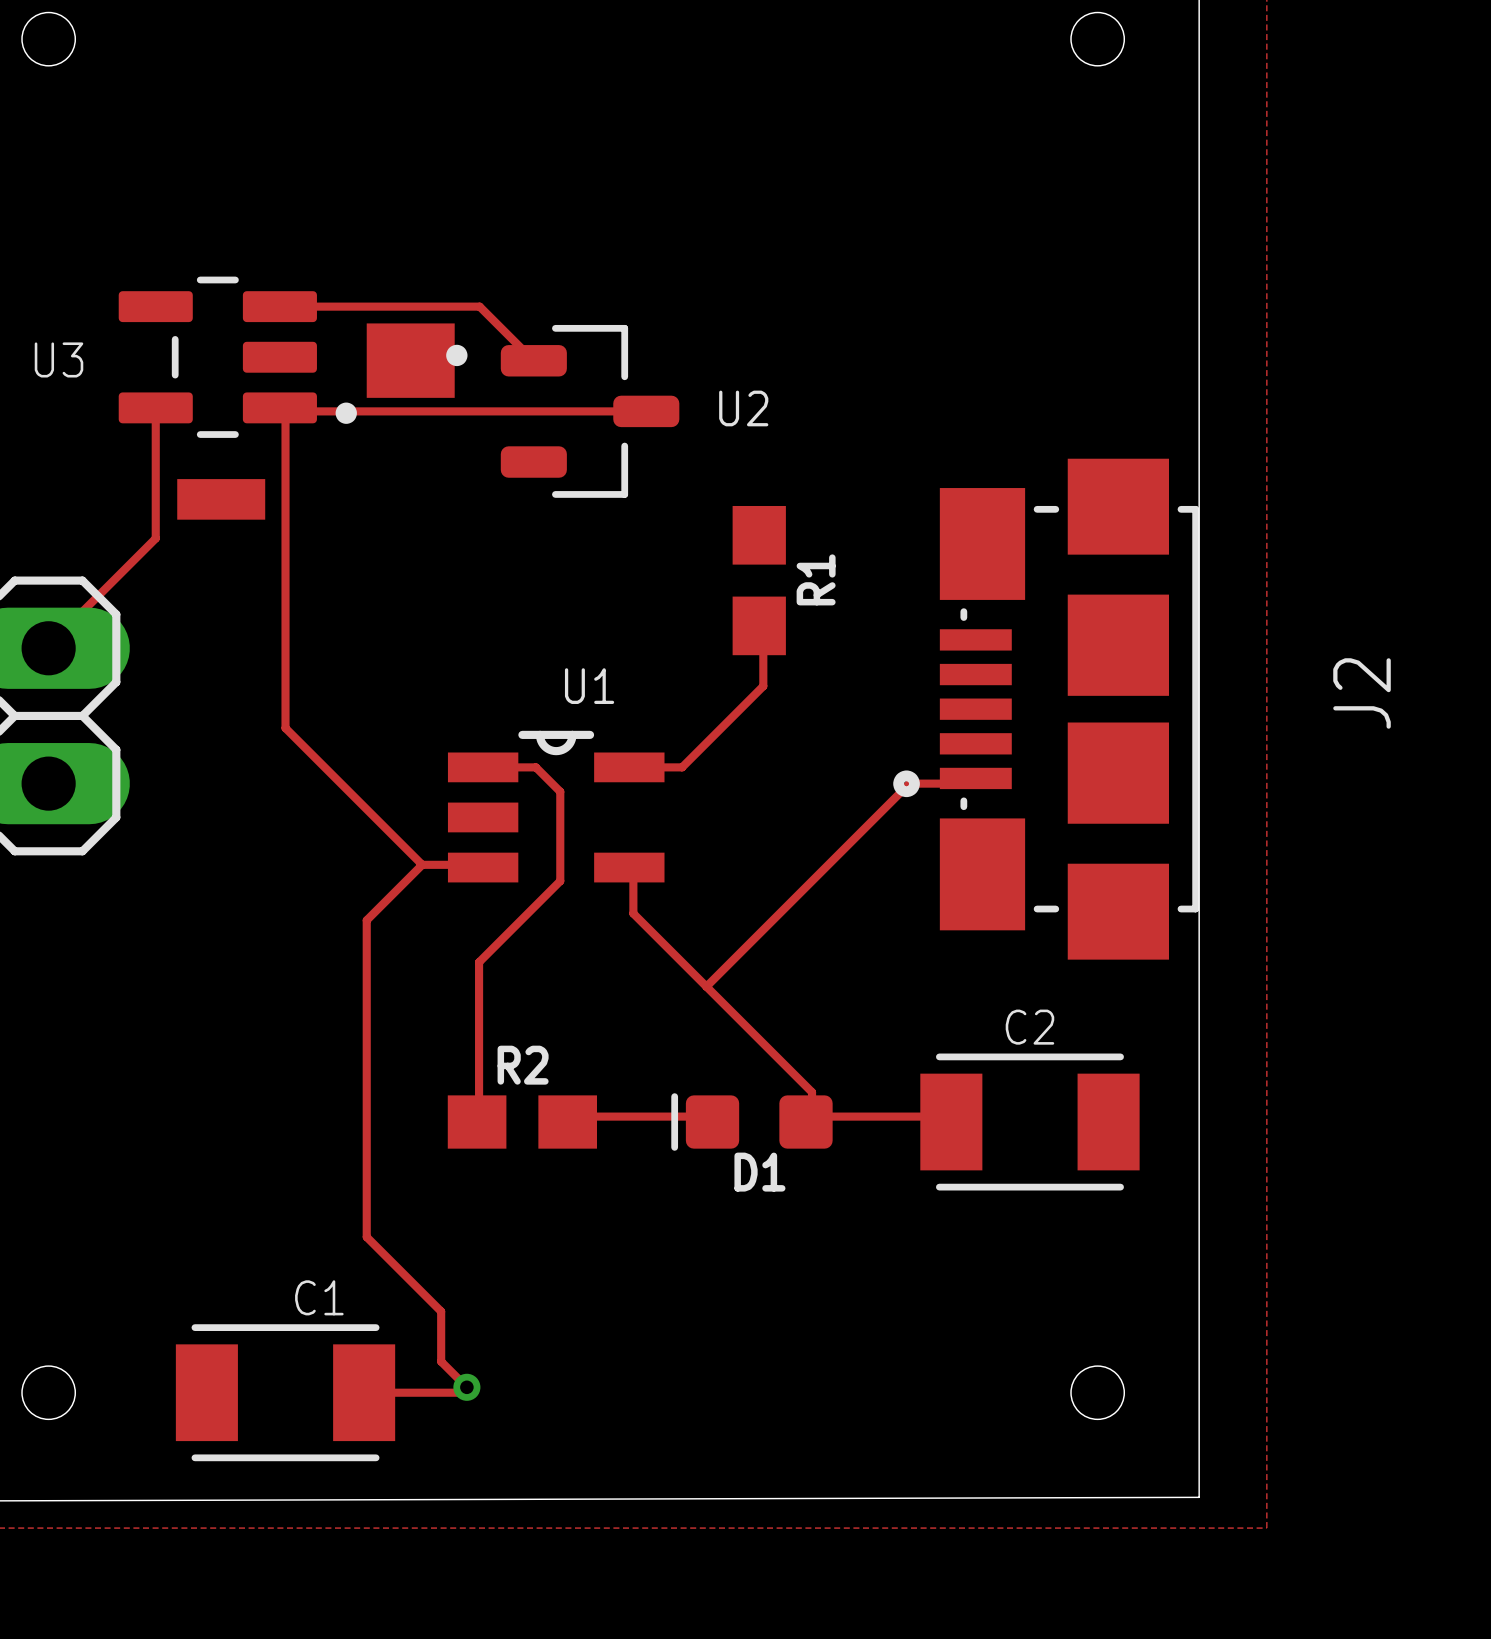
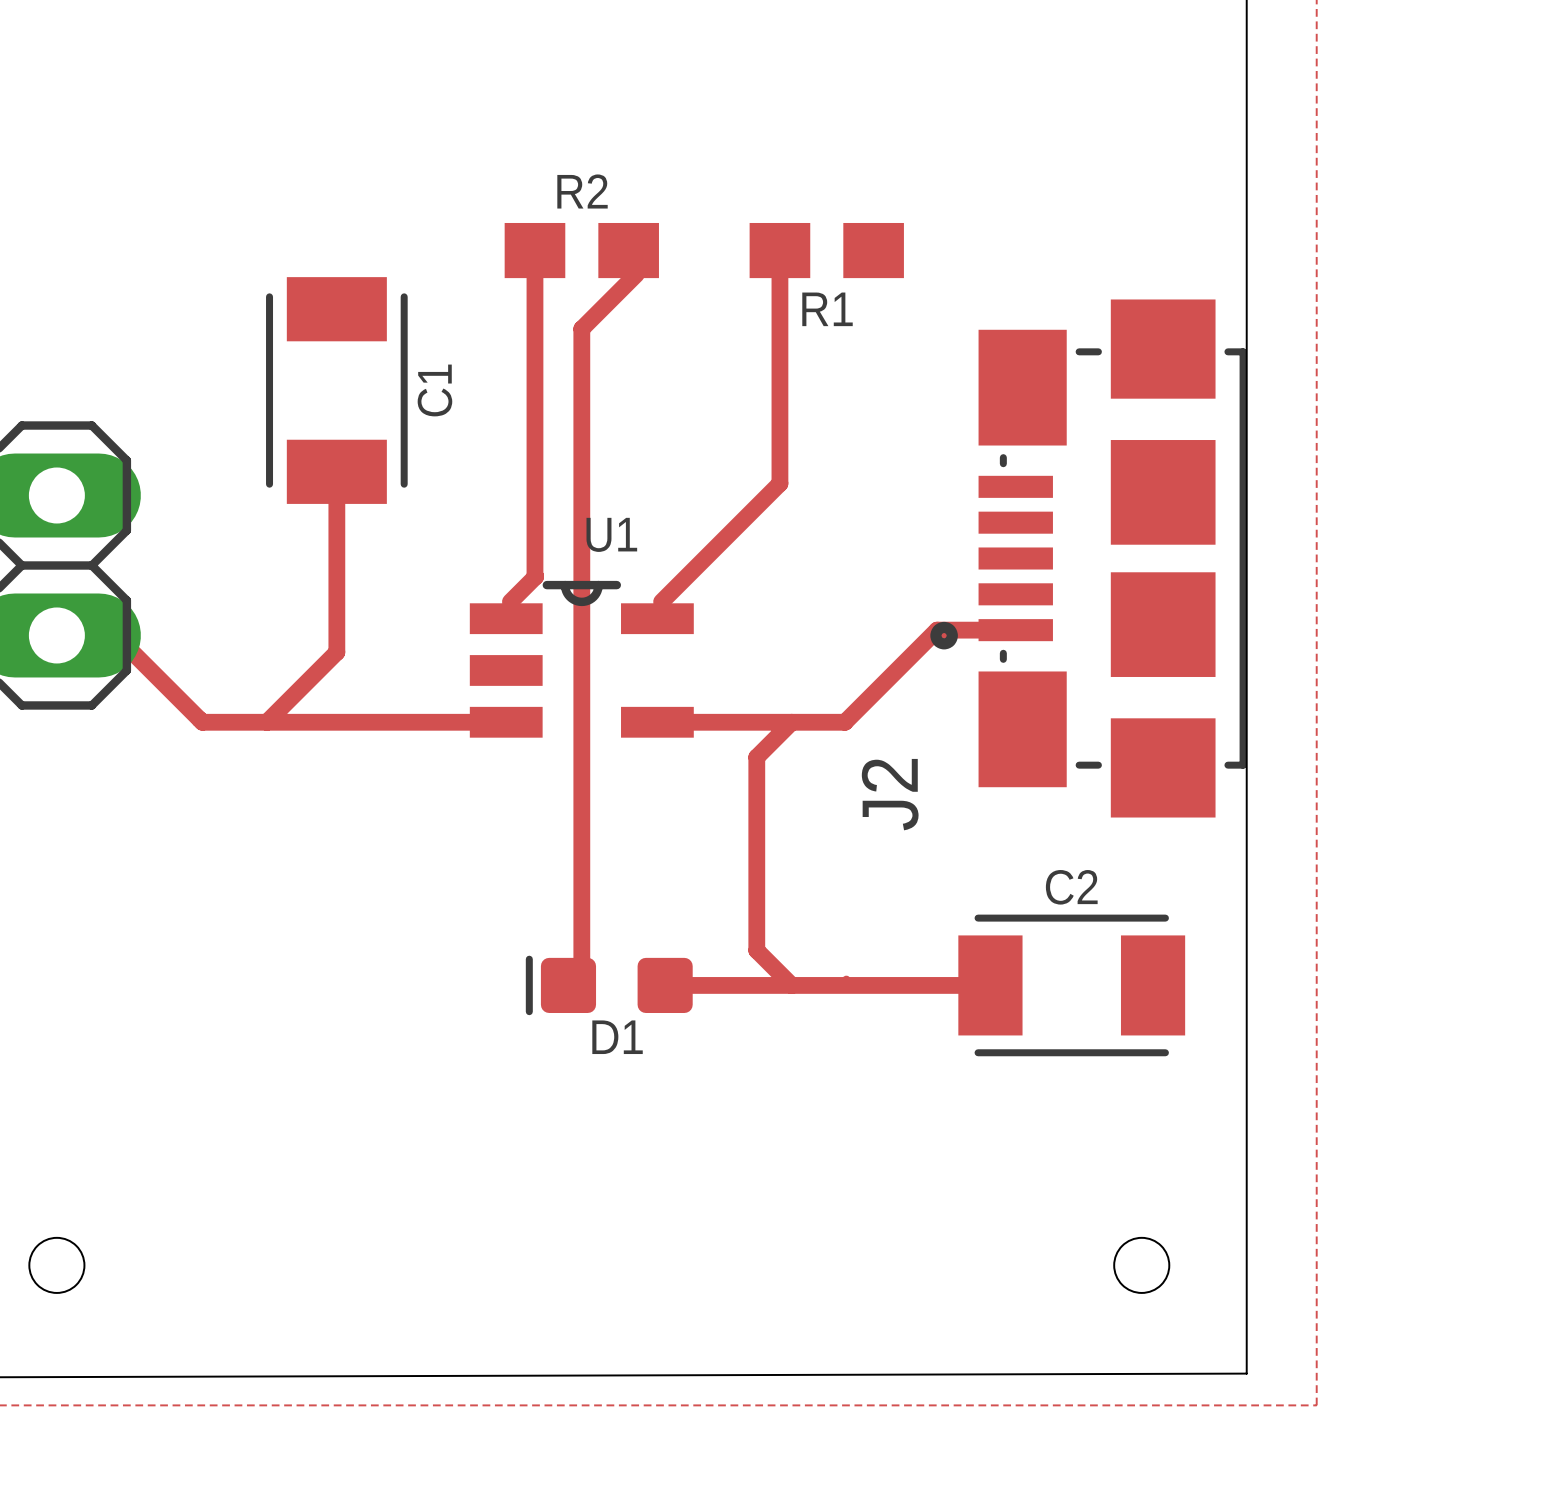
track: (279, 306) (479, 306) (533, 360) -> none
drawing: [366, 323, 455, 398] -> none
U3: (237, 357) -> none
track: (155, 407) (155, 538) (48, 645) (48, 648) -> none
track: (279, 407) (283, 411) (646, 411) -> none
track: (285, 411) (285, 728) (422, 864) (366, 920) (366, 1237) (441, 1311) (441, 1361) (466, 1387) (466, 1392) (364, 1392) -> none
track: none -> (534, 250) (534, 576)
U2: (562, 411) -> none
track: none -> (628, 250) (636, 257) (636, 274) (581, 328) (581, 972) (568, 985)
drawing: [177, 479, 266, 520] -> none
R1 rotation: 0° (759, 580) -> 90° clockwise (826, 250)
R1 position: (759, 580) -> (826, 250)
track: none -> (336, 471) (336, 652) (266, 722)
track: (759, 625) (763, 629) (763, 686) (682, 767) (633, 767) -> (779, 250) (779, 483) (661, 601) (661, 618)
J2 name position: J2 (1362, 693) -> J2 (890, 794)
track: (487, 767) (535, 767) (560, 791) (560, 881) (479, 962) (479, 1116) (477, 1122) -> (510, 618) (510, 601) (535, 576)
track: (975, 778) (974, 783) (909, 783) (706, 986) -> (1015, 630) (937, 630) (844, 722) (657, 722)
track: none -> (56, 635) (115, 635) (202, 722) (506, 722)
track: (629, 867) (633, 872) (633, 913) (812, 1092) (812, 1116) (950, 1116) (951, 1122) -> (665, 985) (990, 985)
track: none -> (791, 722) (756, 757) (756, 950) (791, 985)
R2 position: (522, 1122) -> (581, 250)
track: (567, 1122) (568, 1116) (706, 1116) (712, 1122) -> none
D1 position: (751, 1122) -> (609, 985)
via: (466, 1387) -> none
C1 rotation: 0° (285, 1392) -> 90° clockwise (336, 390)
C1 position: (285, 1392) -> (336, 390)

